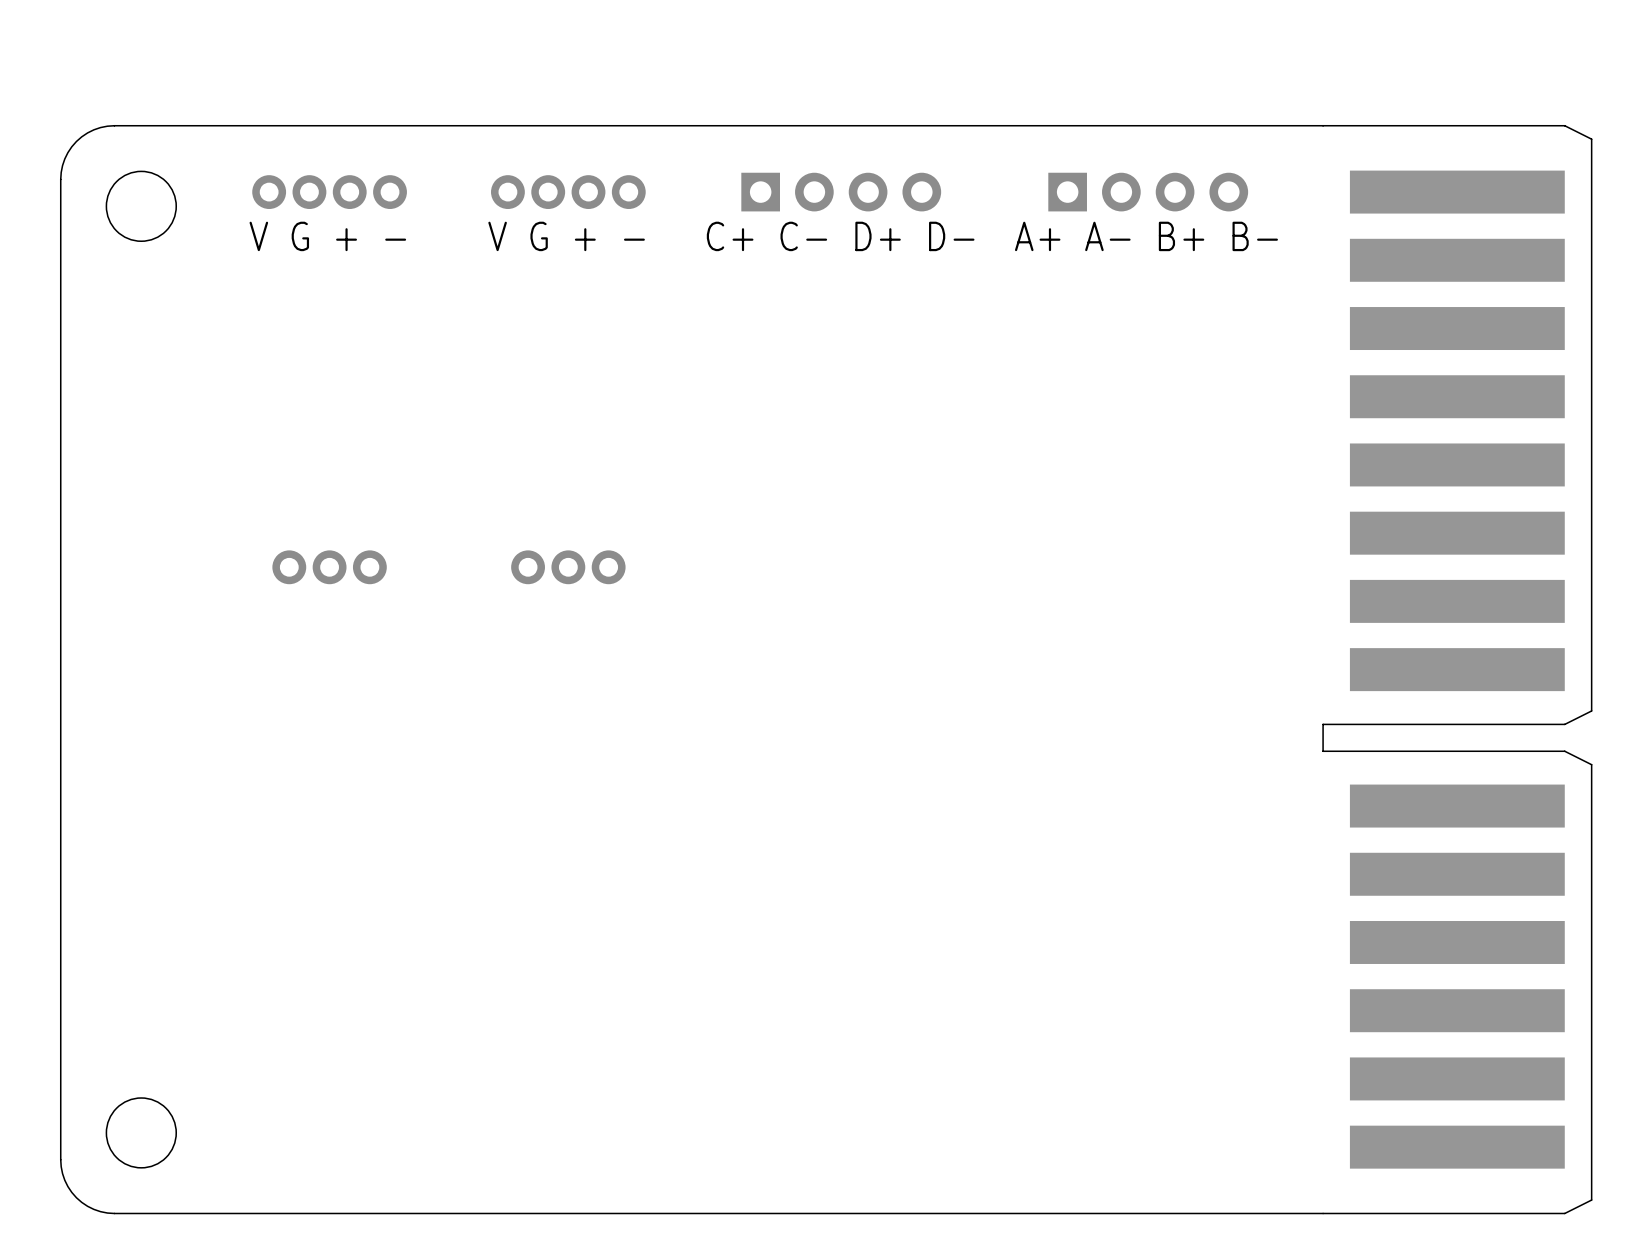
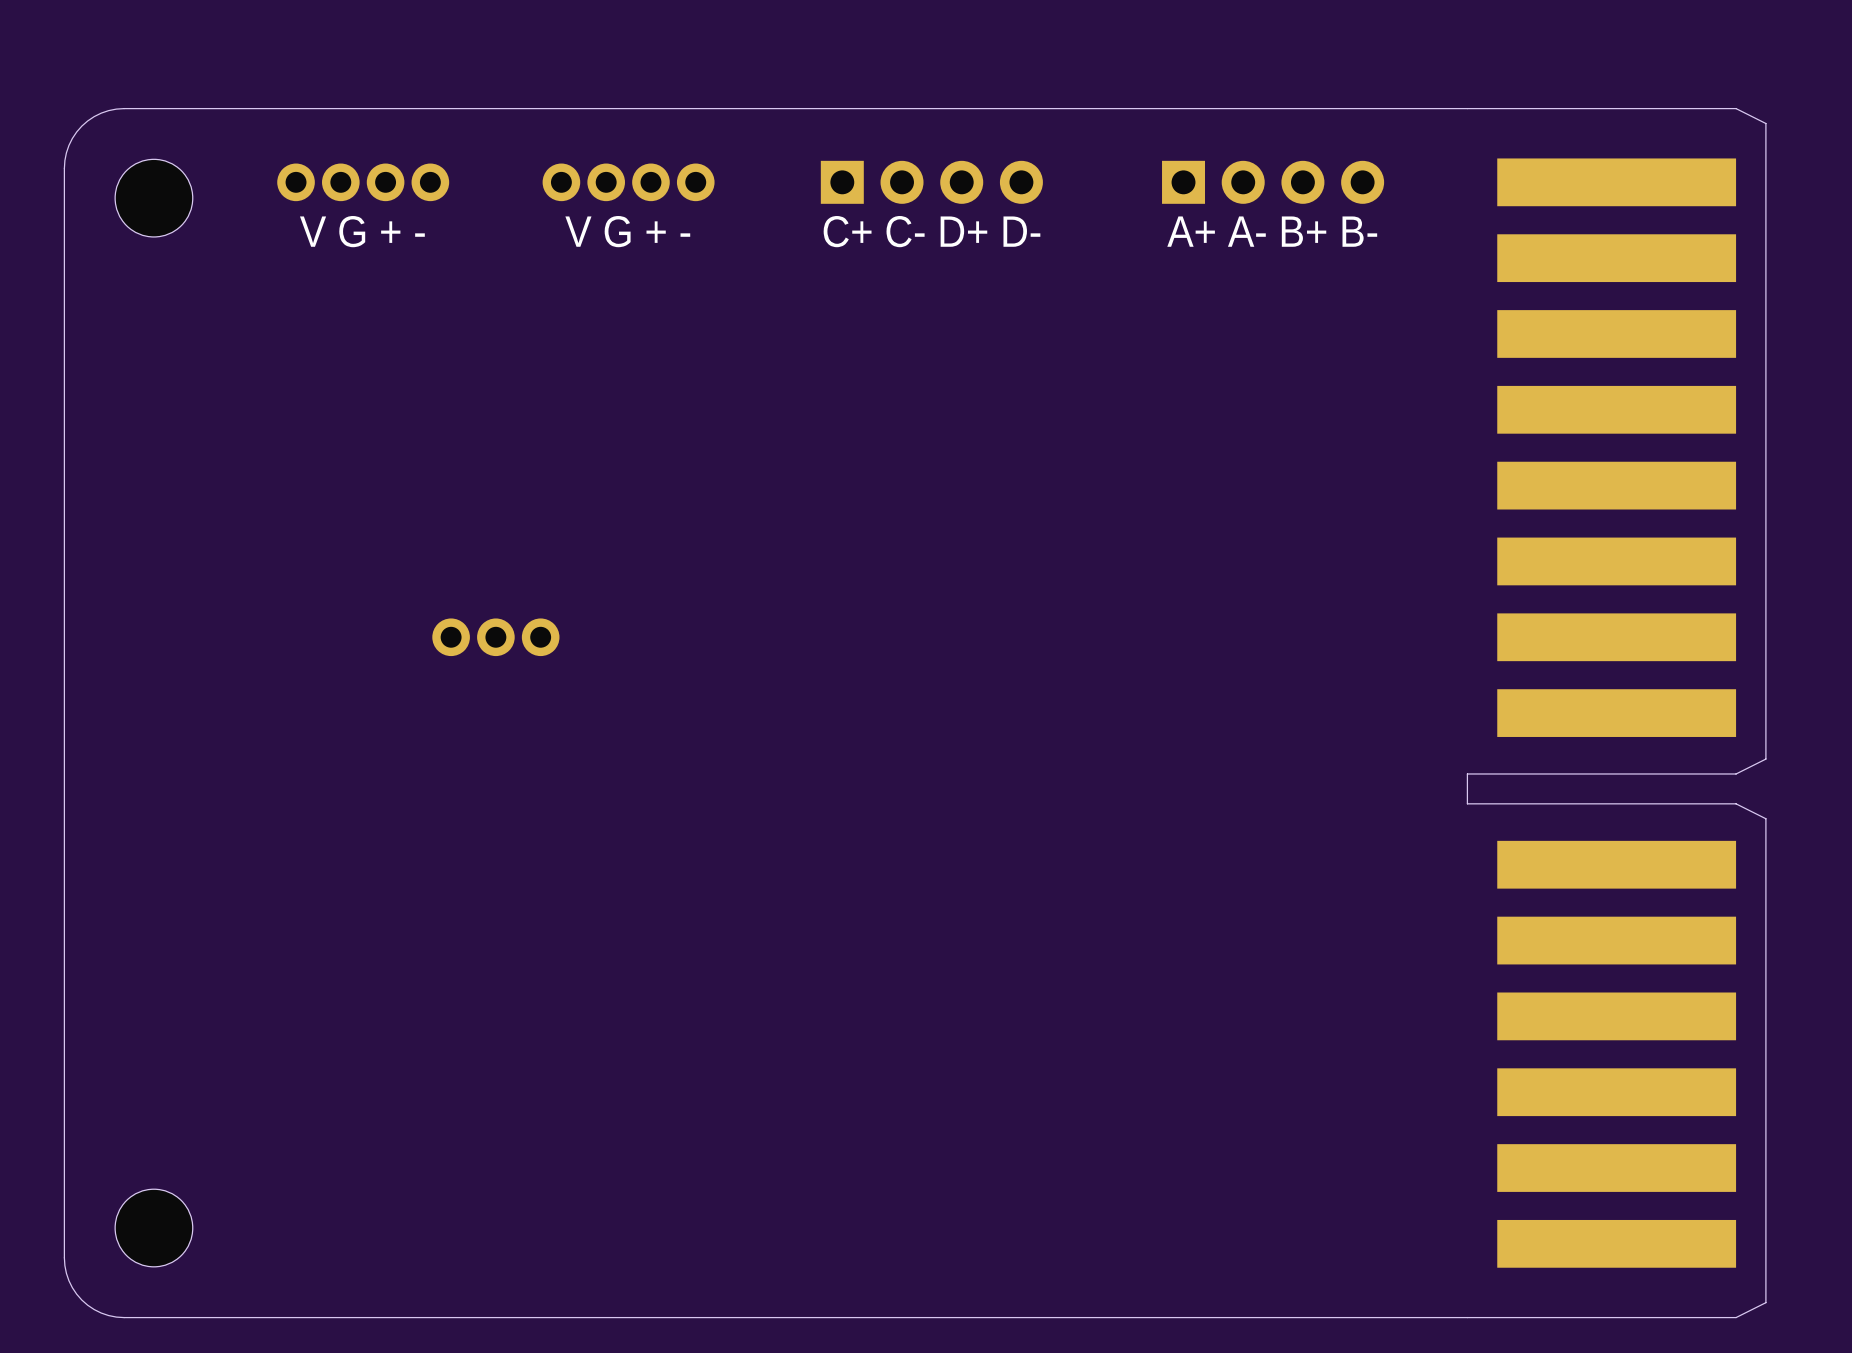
part: (329, 567) -> none
part: (568, 567) -> none
part: none -> (495, 637)

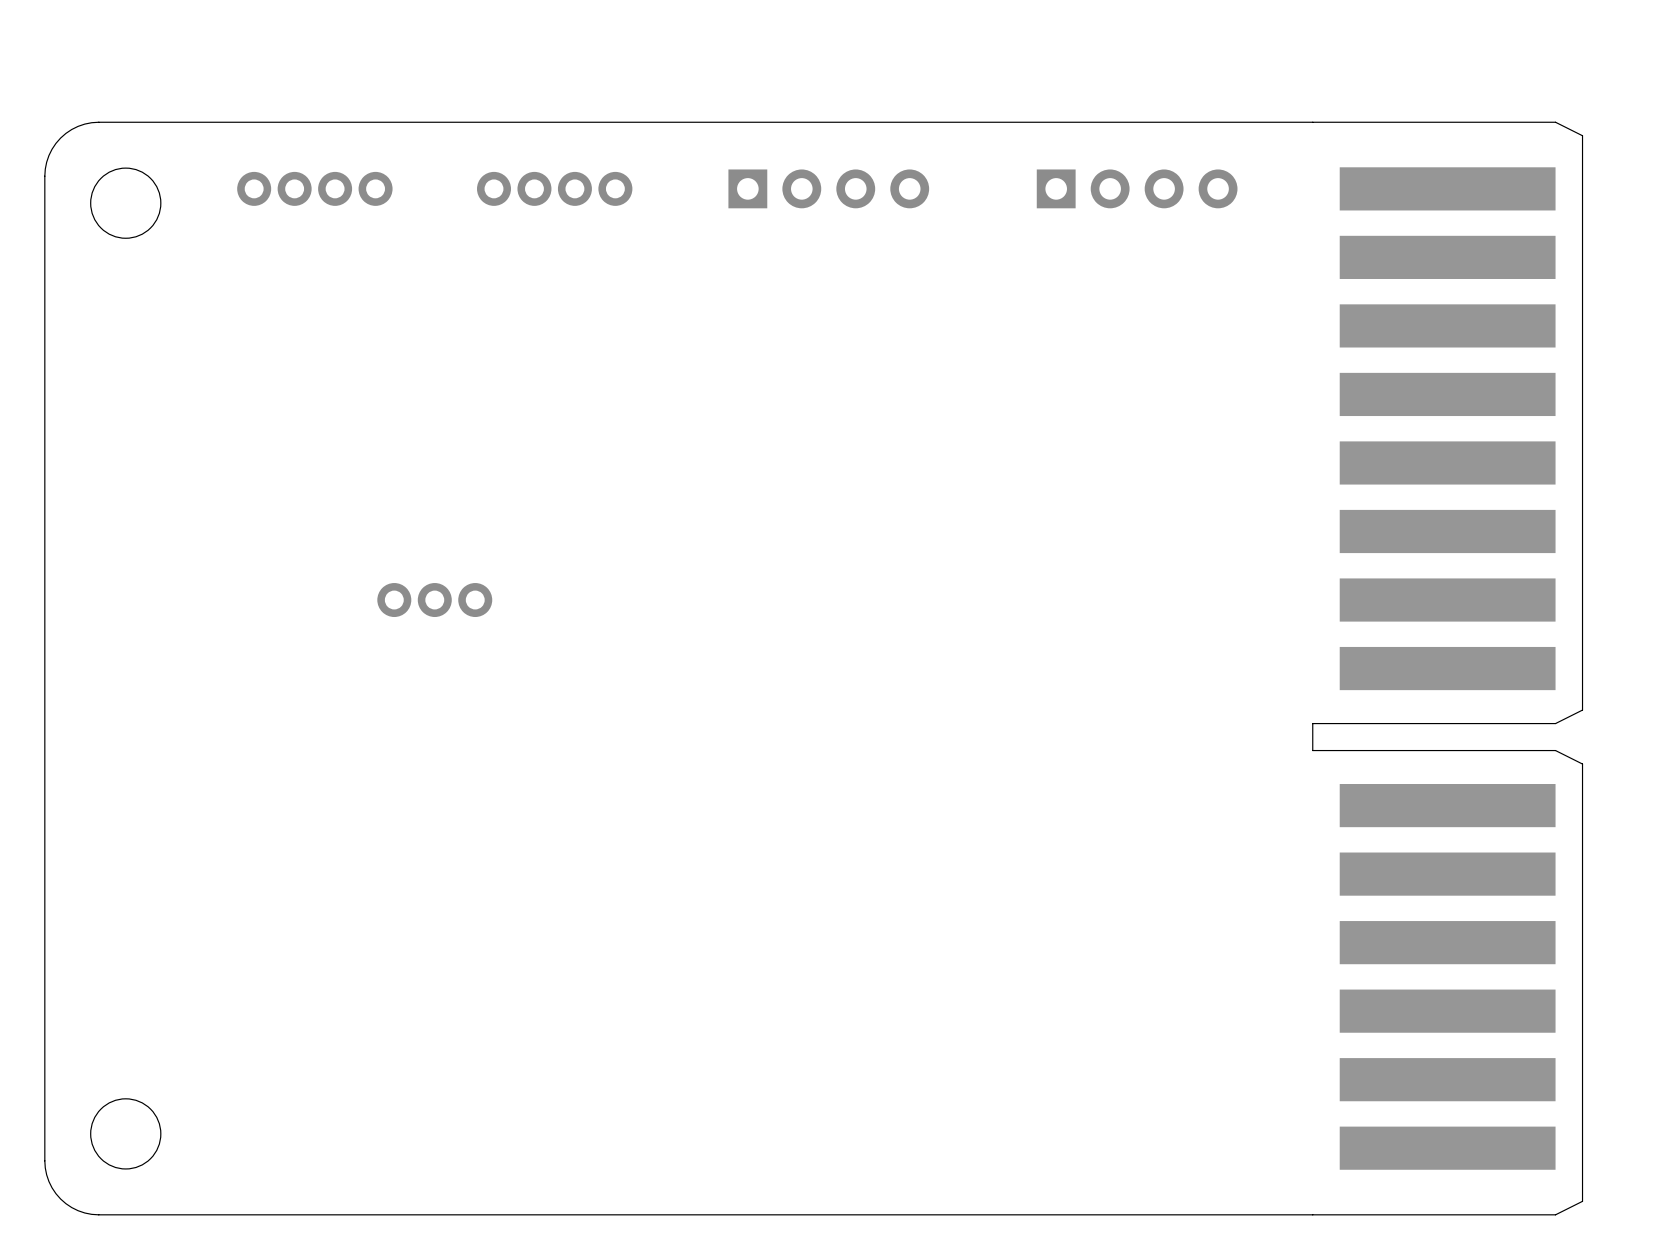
text: V G + - (362, 231) -> none
text: V G + - (627, 231) -> none
text: C+ C- D+ D- (931, 231) -> none
text: A+ A- B+ B- (1272, 231) -> none

